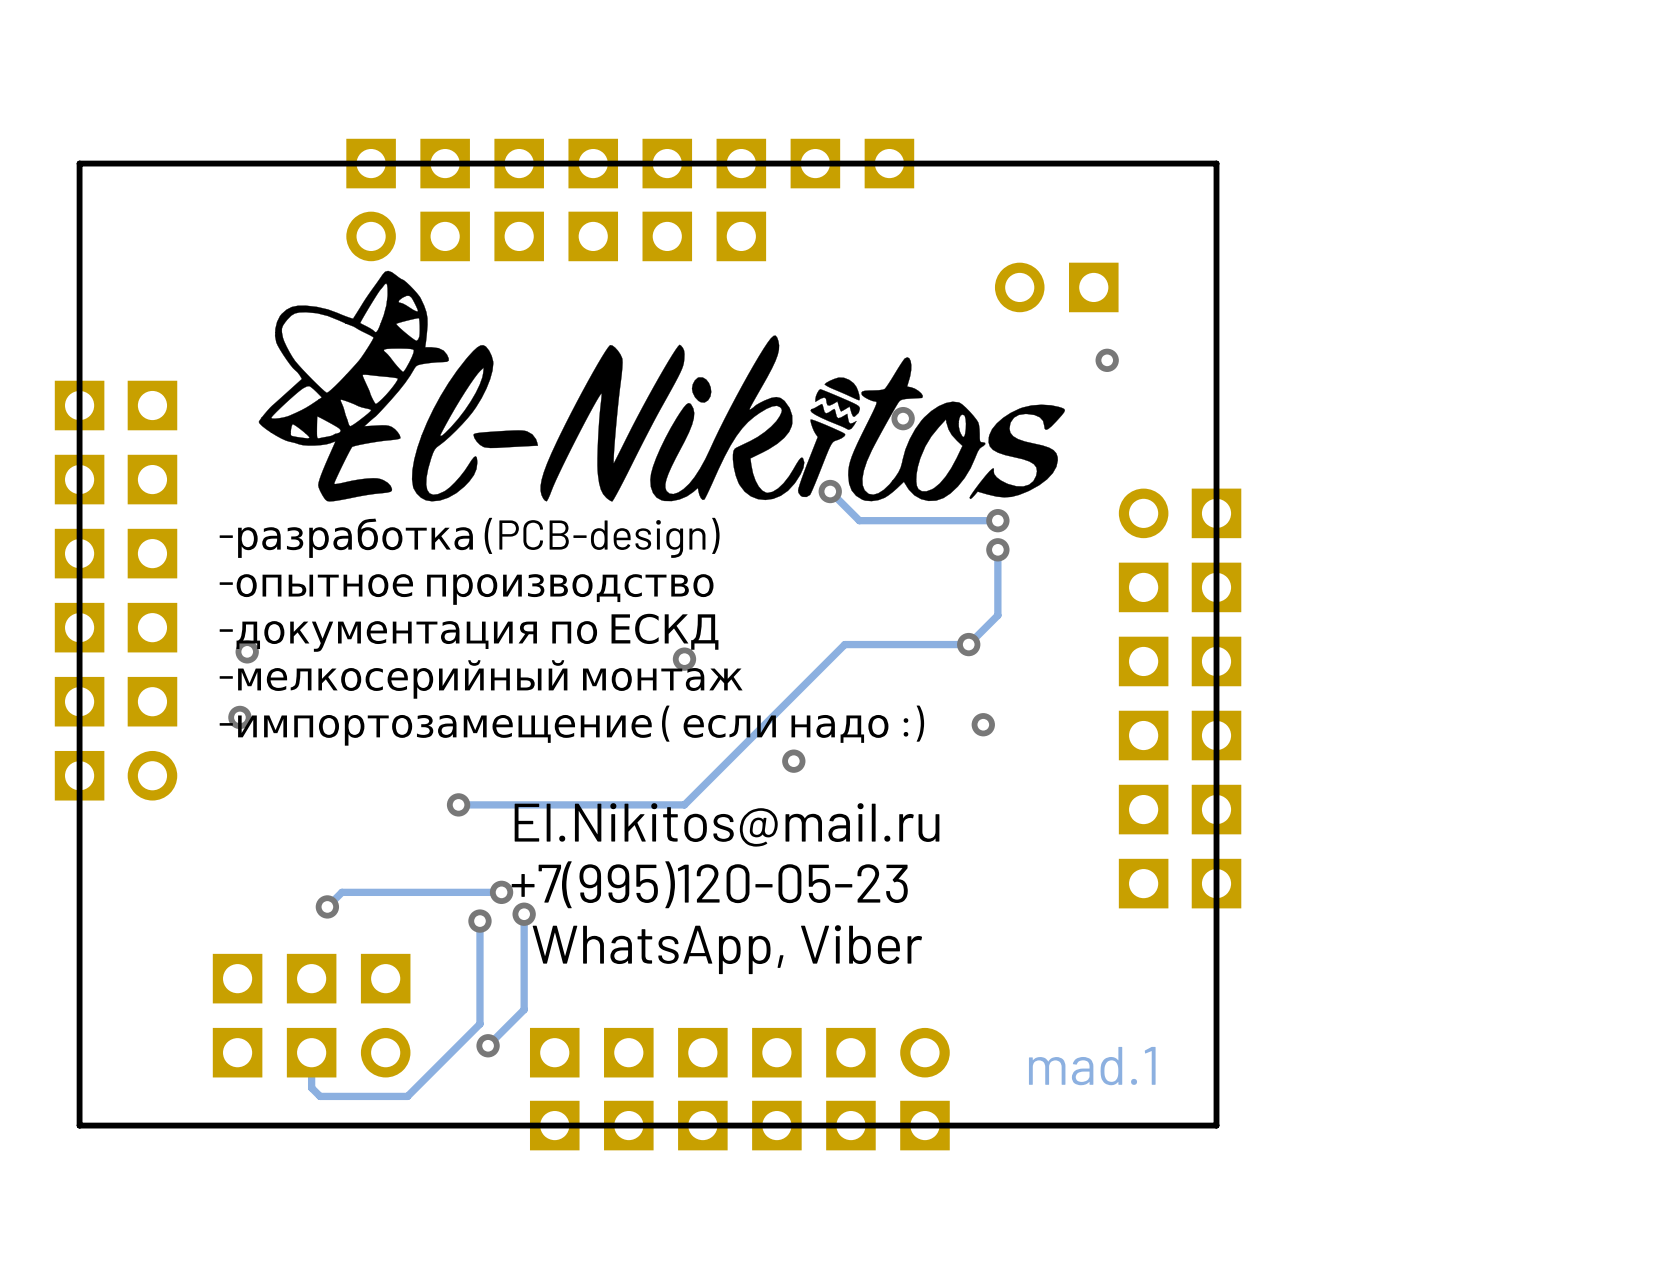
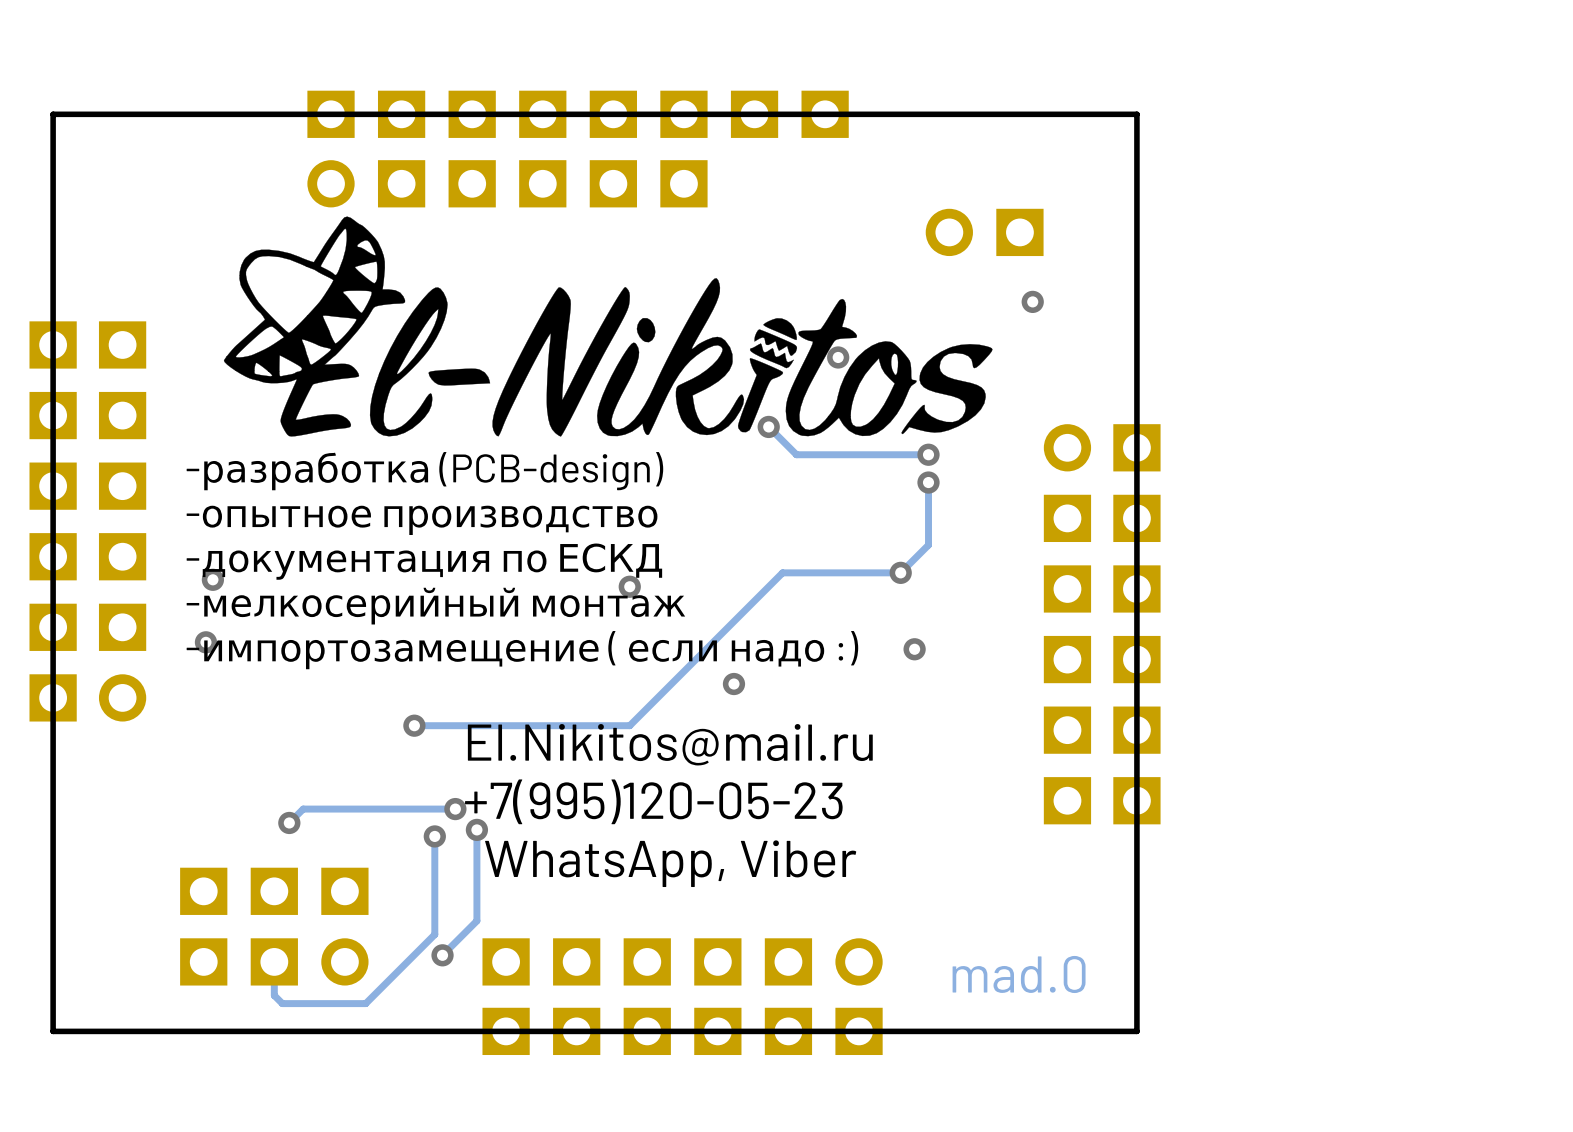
text: mad.1 (1092, 1066) -> mad.0 (1019, 974)

